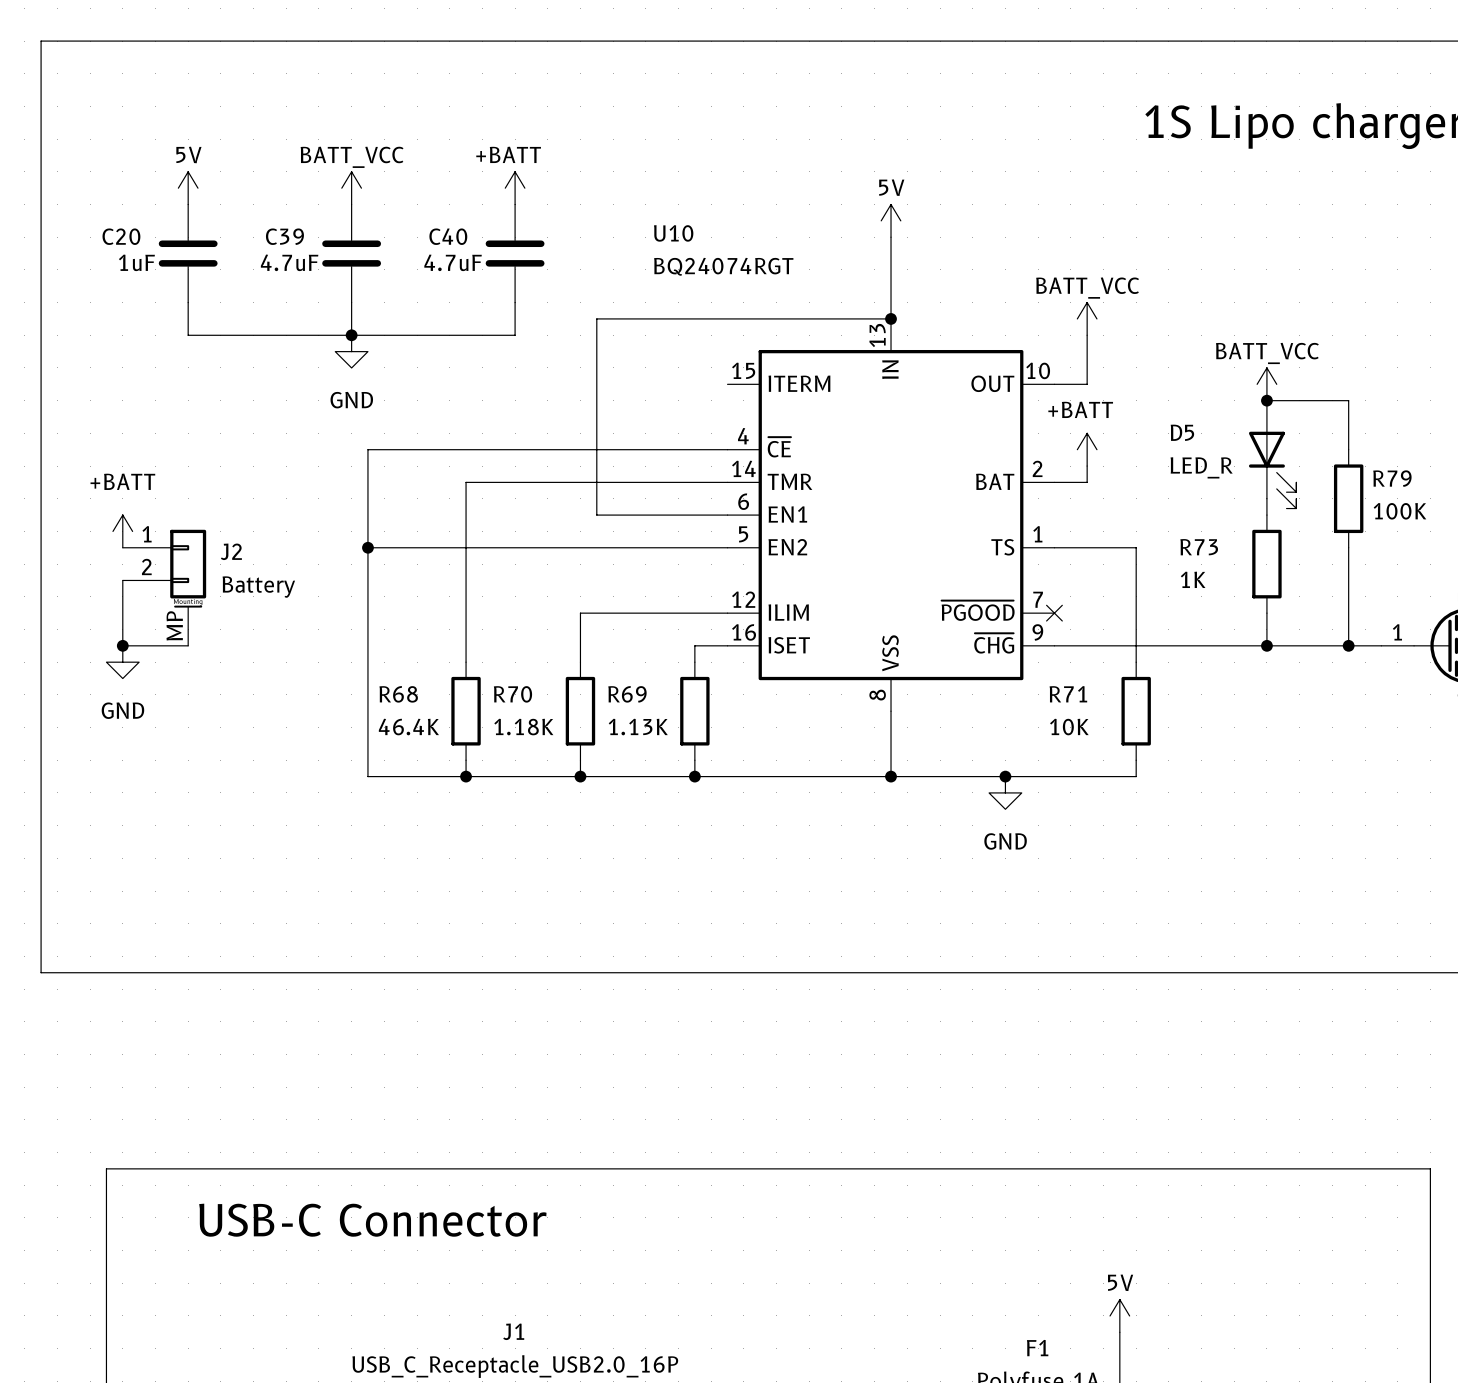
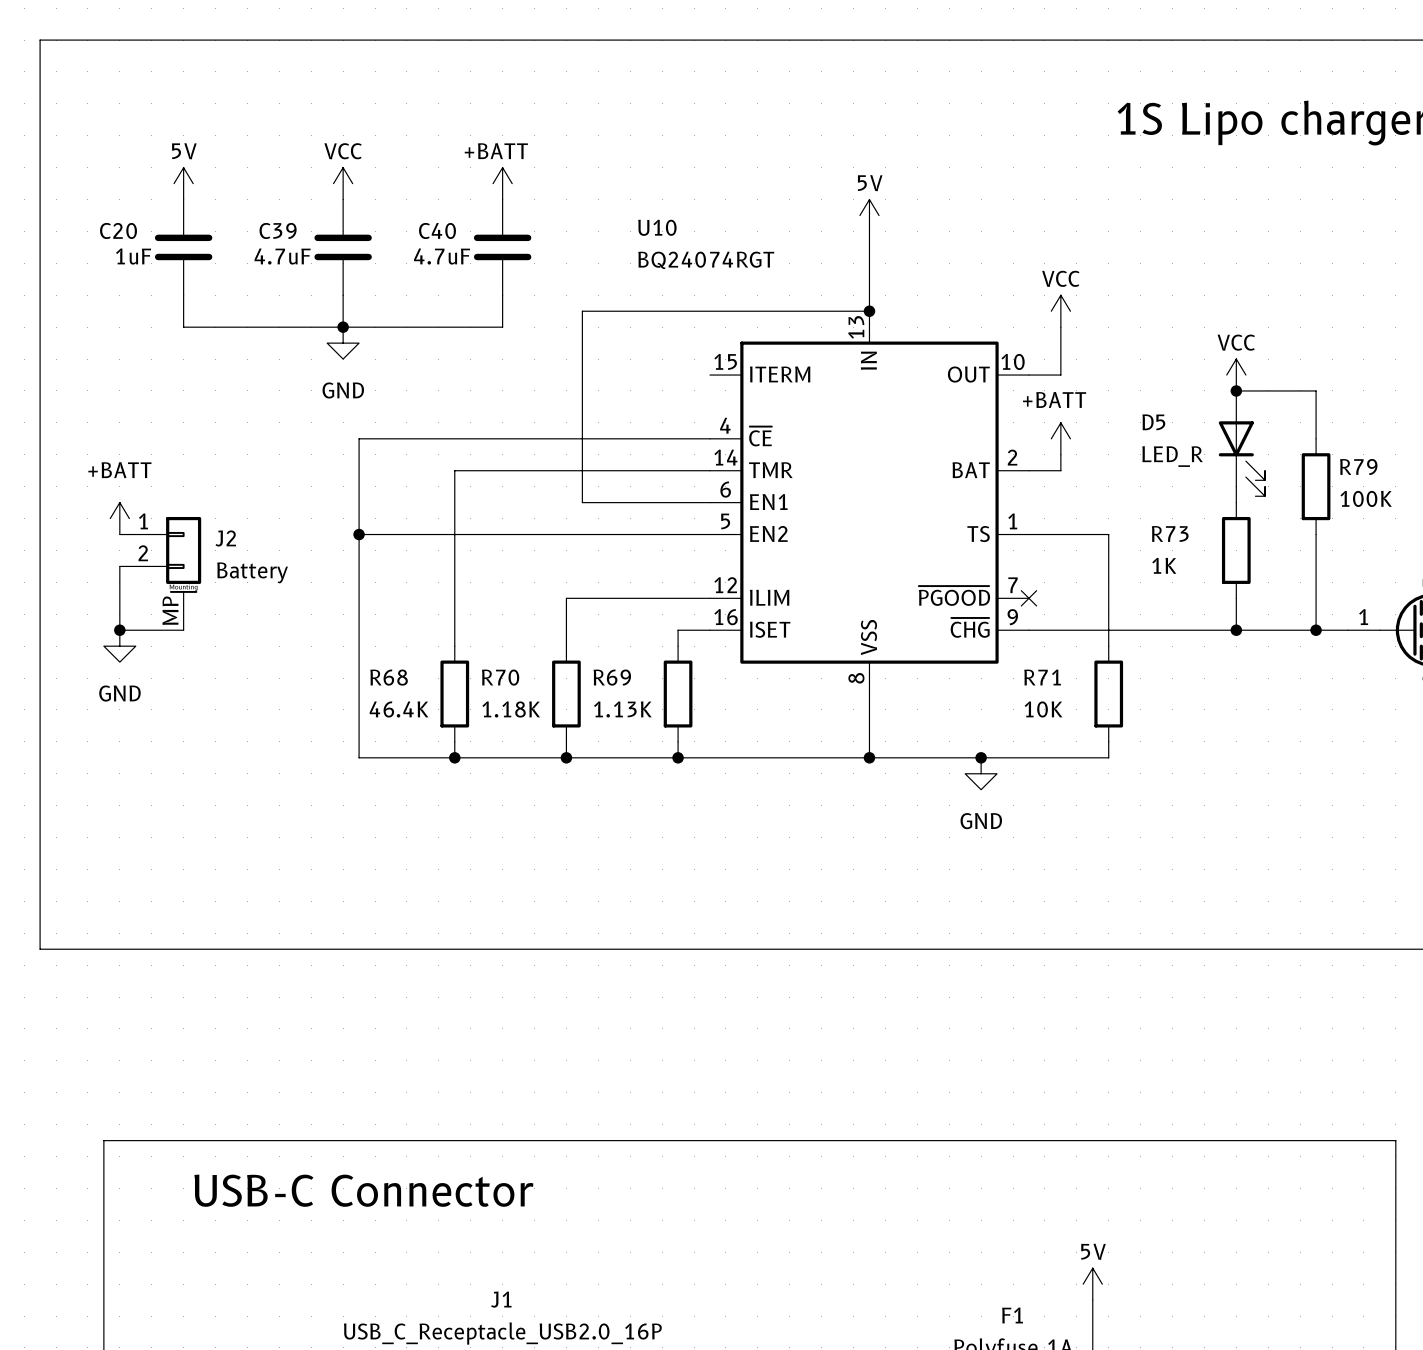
power symbol: BATT_VCC (351, 188) -> VCC (343, 183)
power symbol: BATT_VCC (1087, 318) -> VCC (1060, 311)
power symbol: BATT_VCC (1266, 384) -> VCC (1236, 375)

